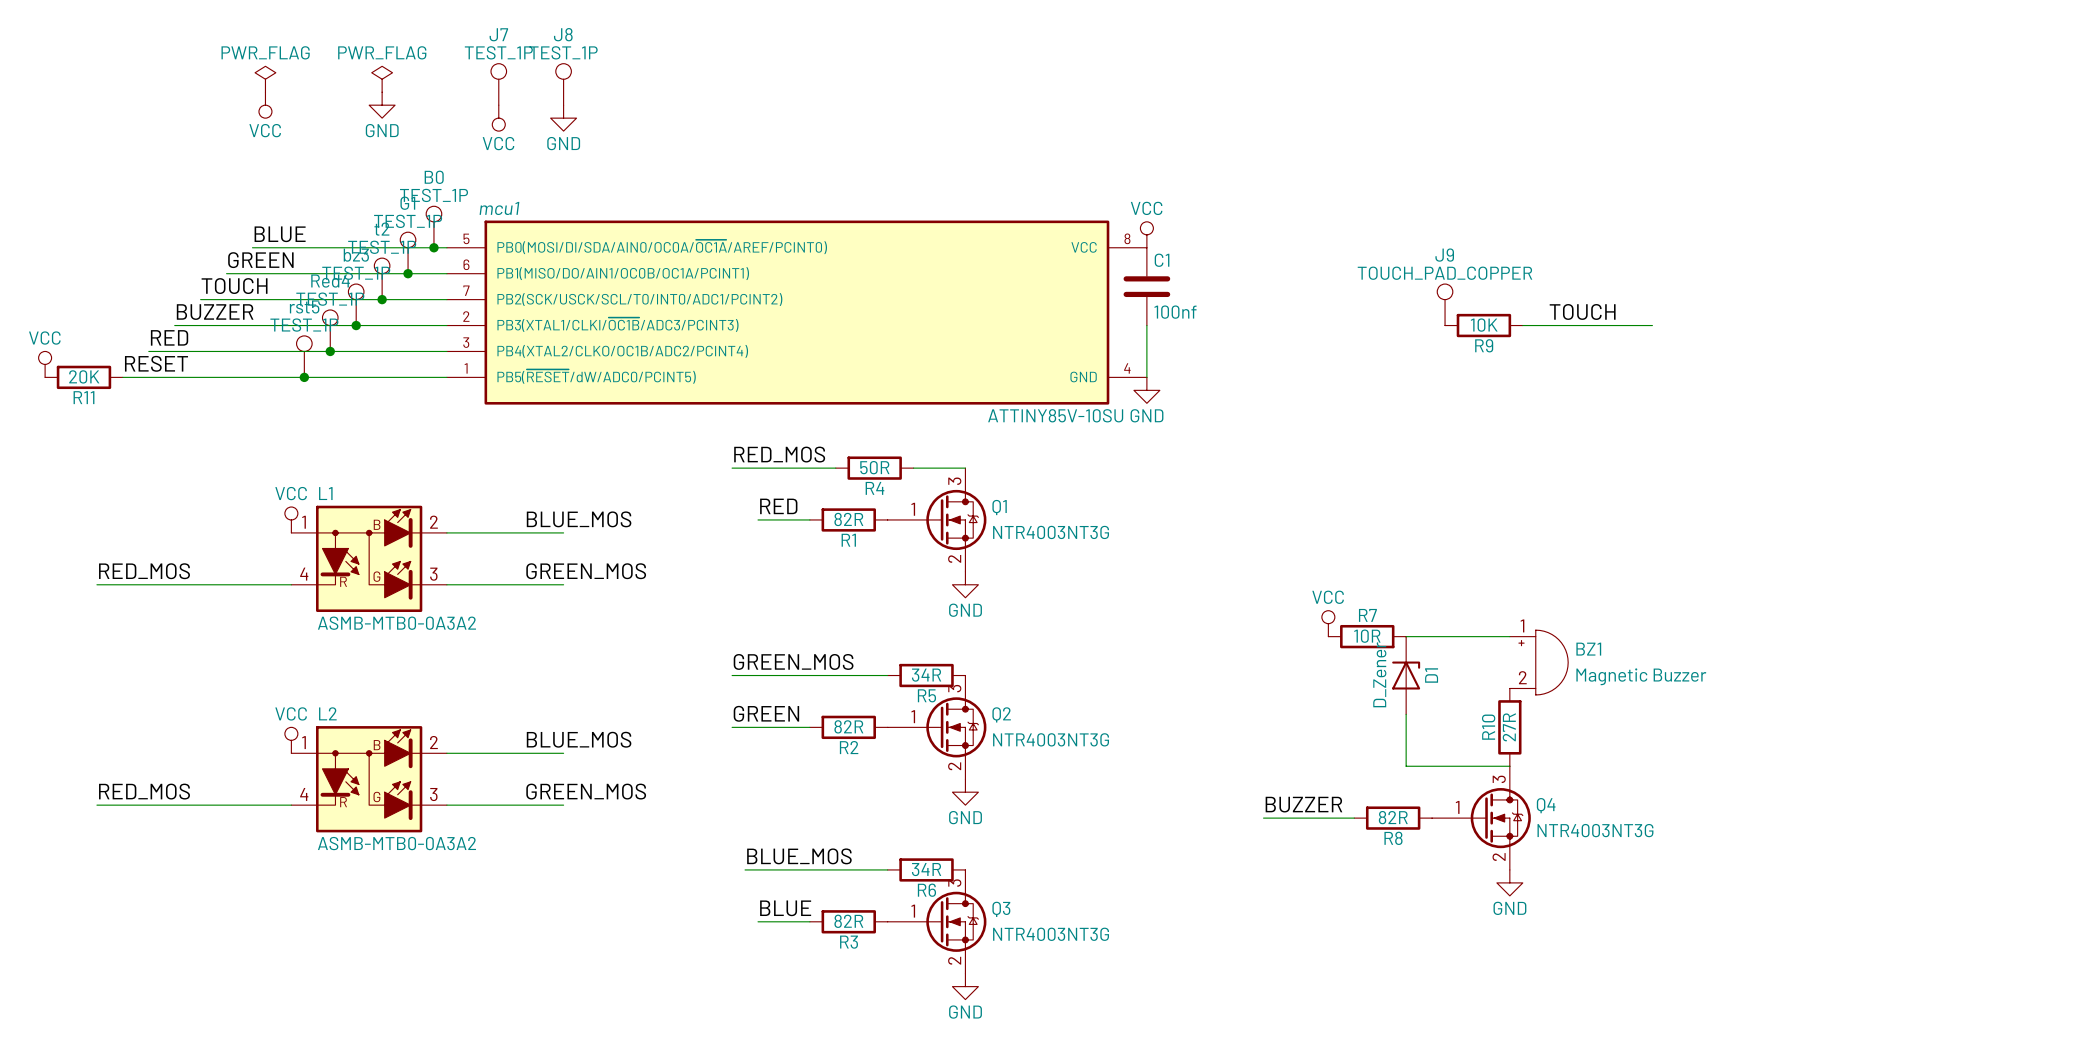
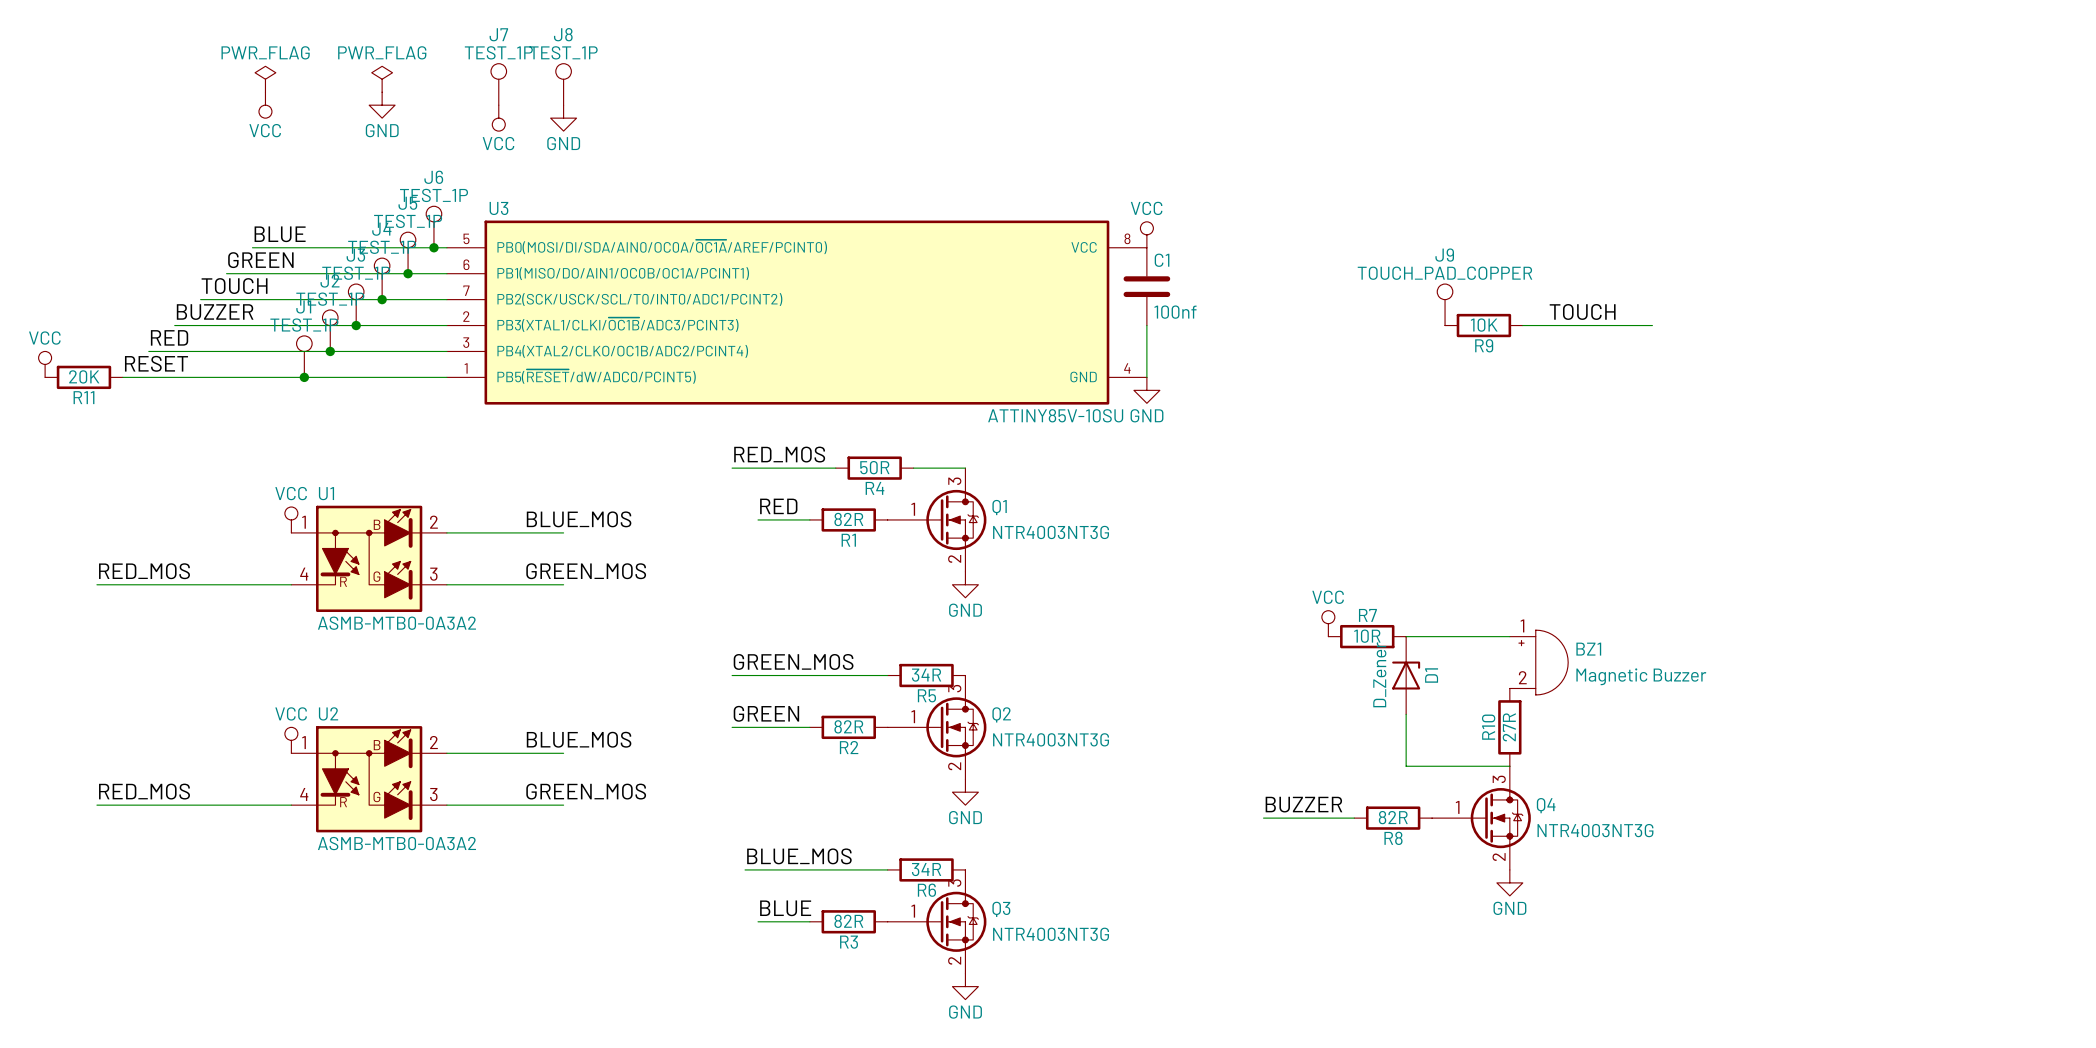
B0 name: B0 (434, 177) -> J6 (433, 177)
G1 name: G1 (407, 203) -> J5 (407, 203)
mcu1 name: mcu1 (499, 208) -> U3 (498, 208)
t2 name: t2 (381, 229) -> J4 (381, 229)
bz3 name: bz3 (356, 255) -> J3 (355, 255)
Red4 name: Red4 (330, 281) -> J2 (330, 280)
rst5 name: rst5 (304, 306) -> J1 (303, 306)
L1 name: L1 (325, 493) -> U1 (326, 493)
L2 name: L2 (327, 713) -> U2 (328, 713)

